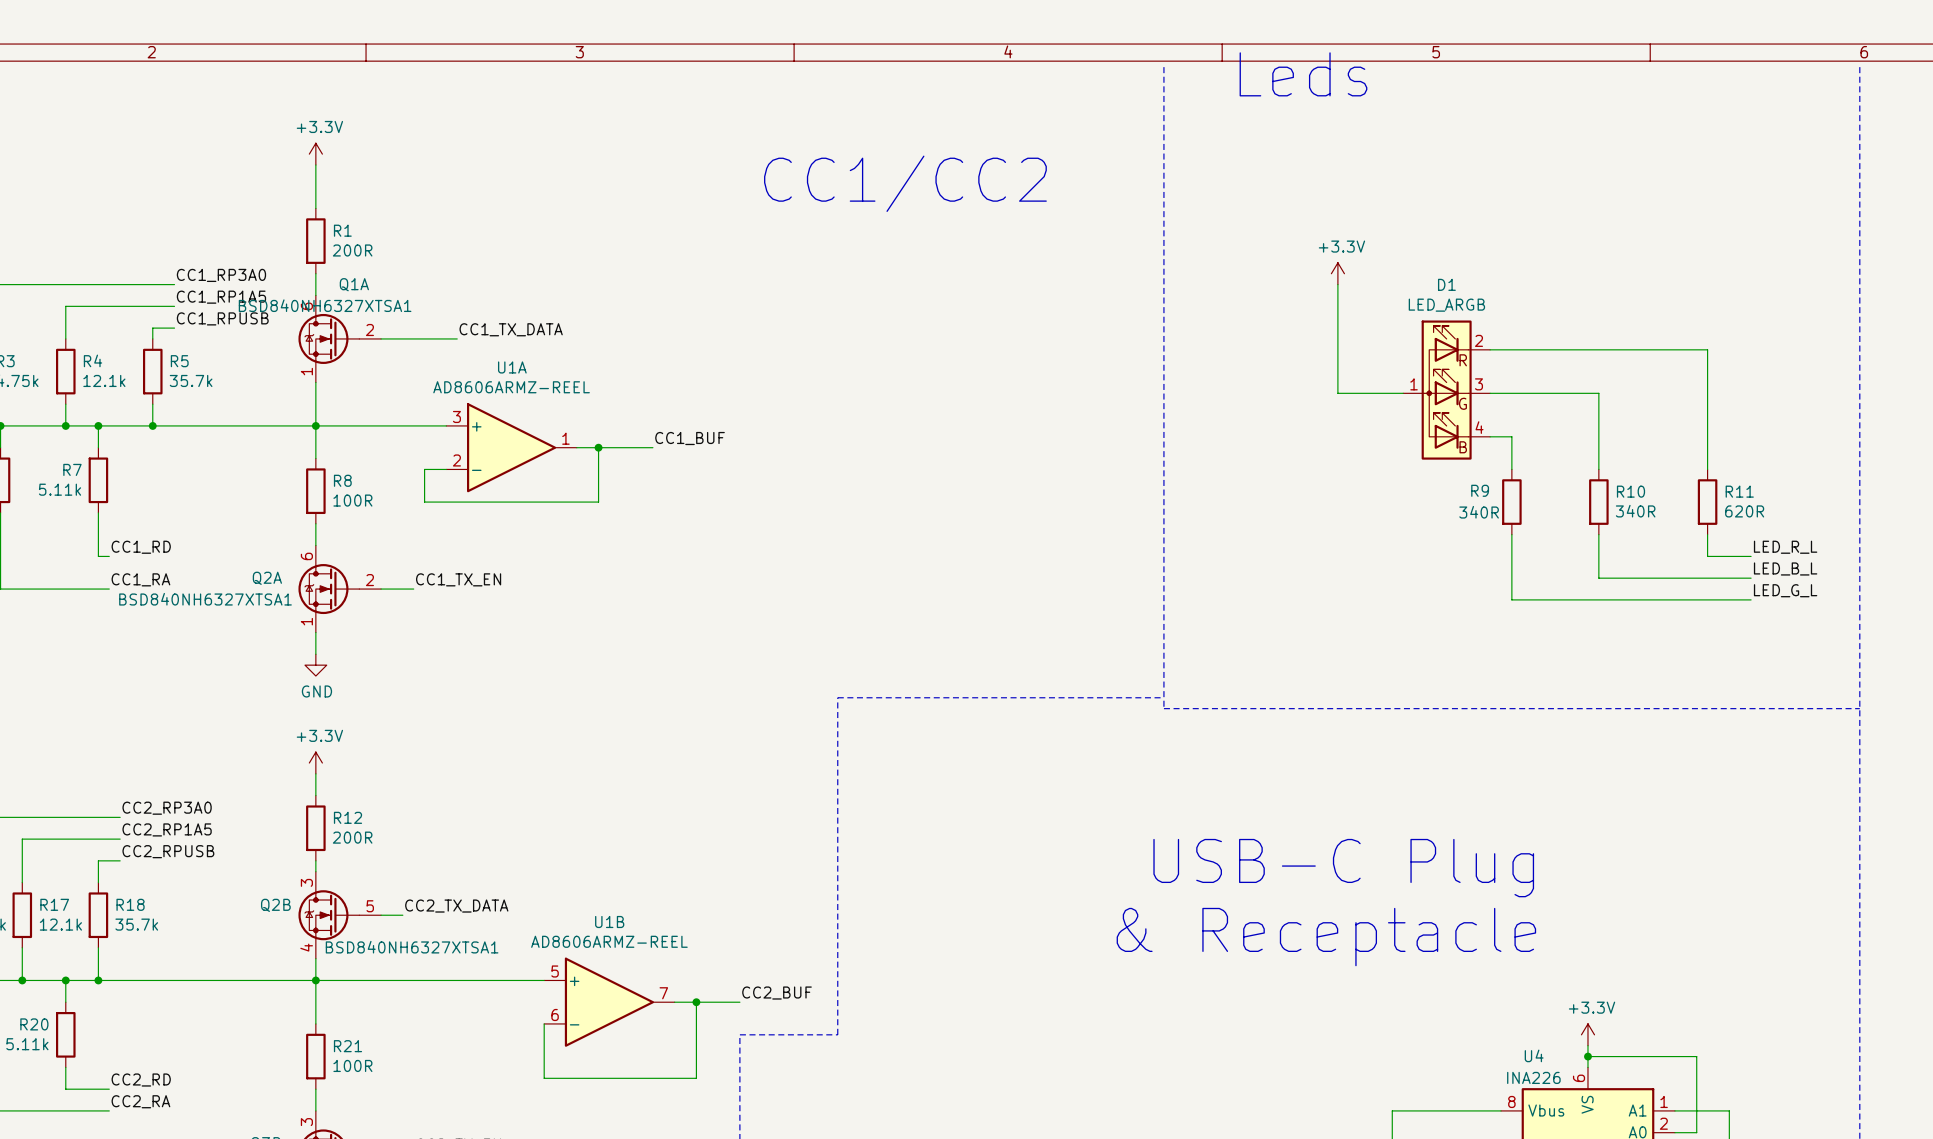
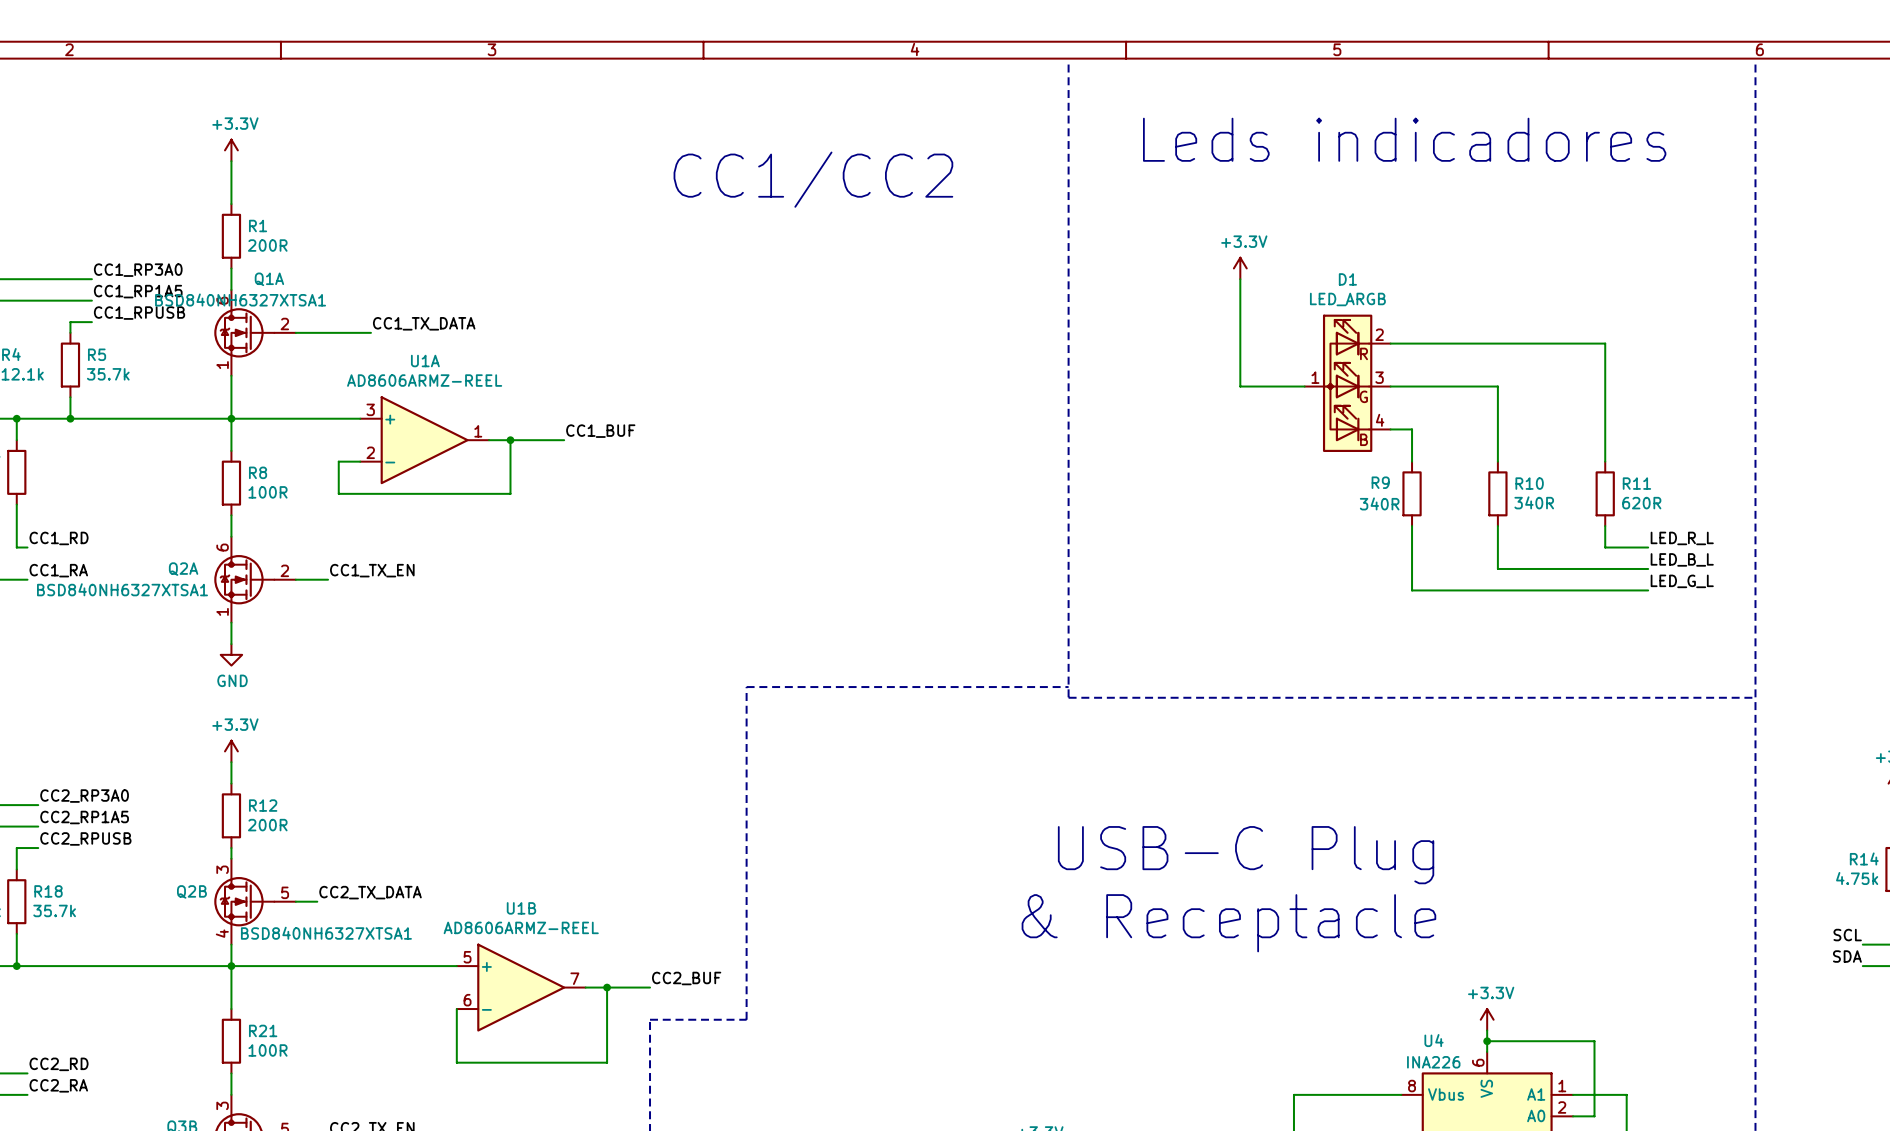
text: Leds (1303, 74) -> none
text: none -> Leds indicadores (1404, 139)

